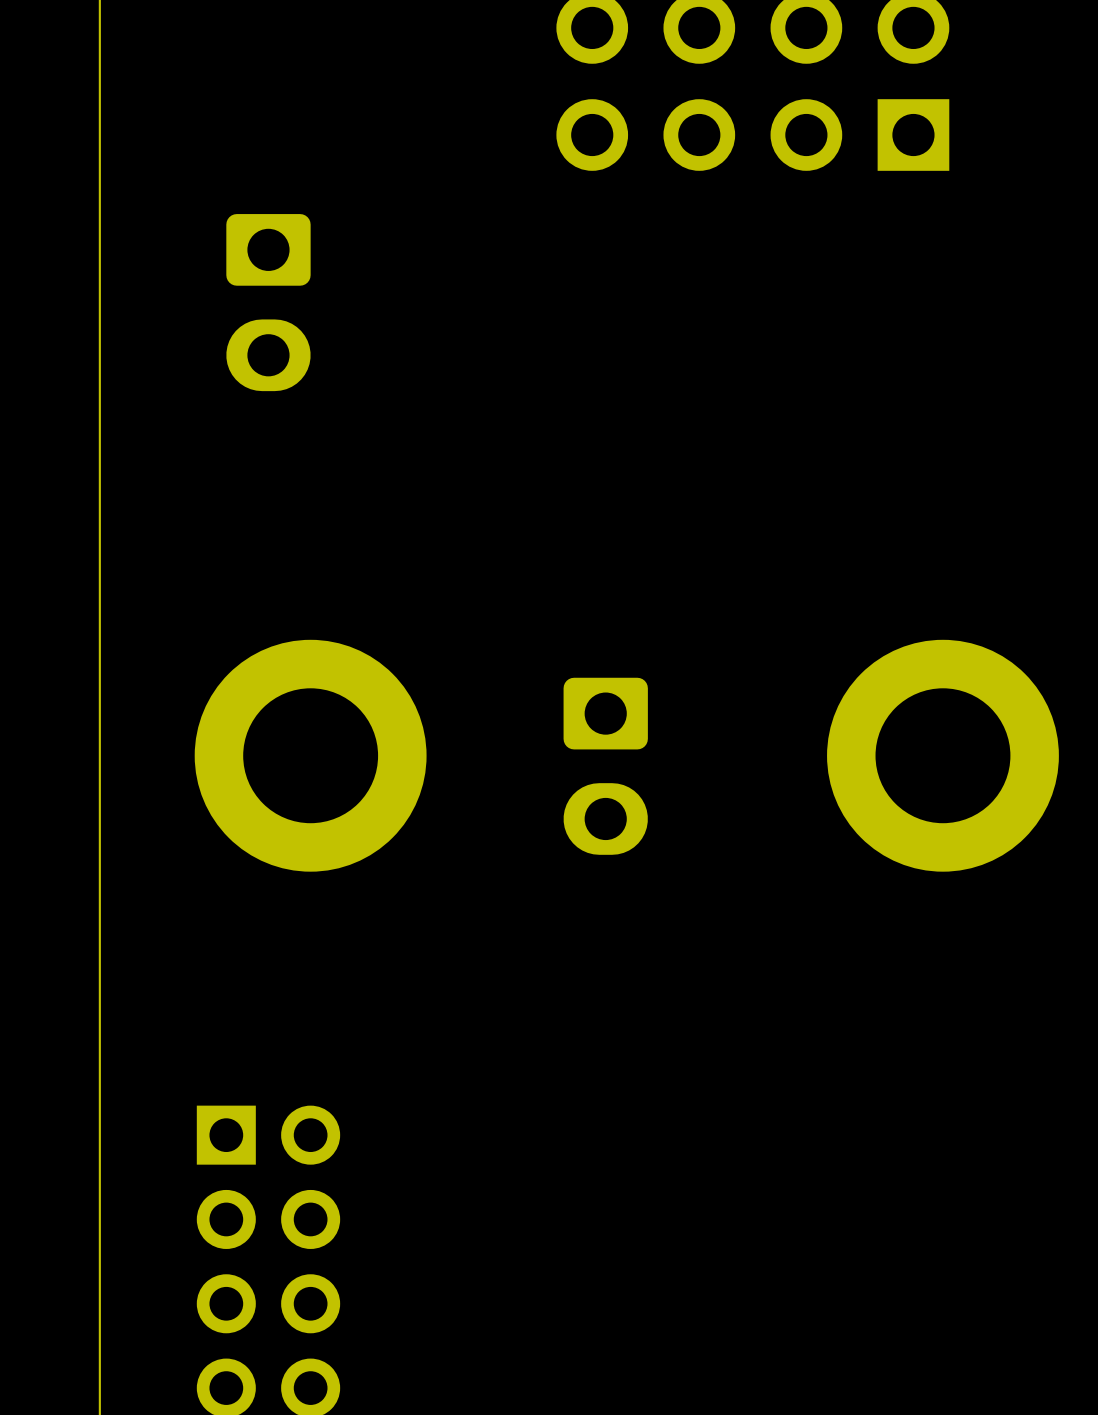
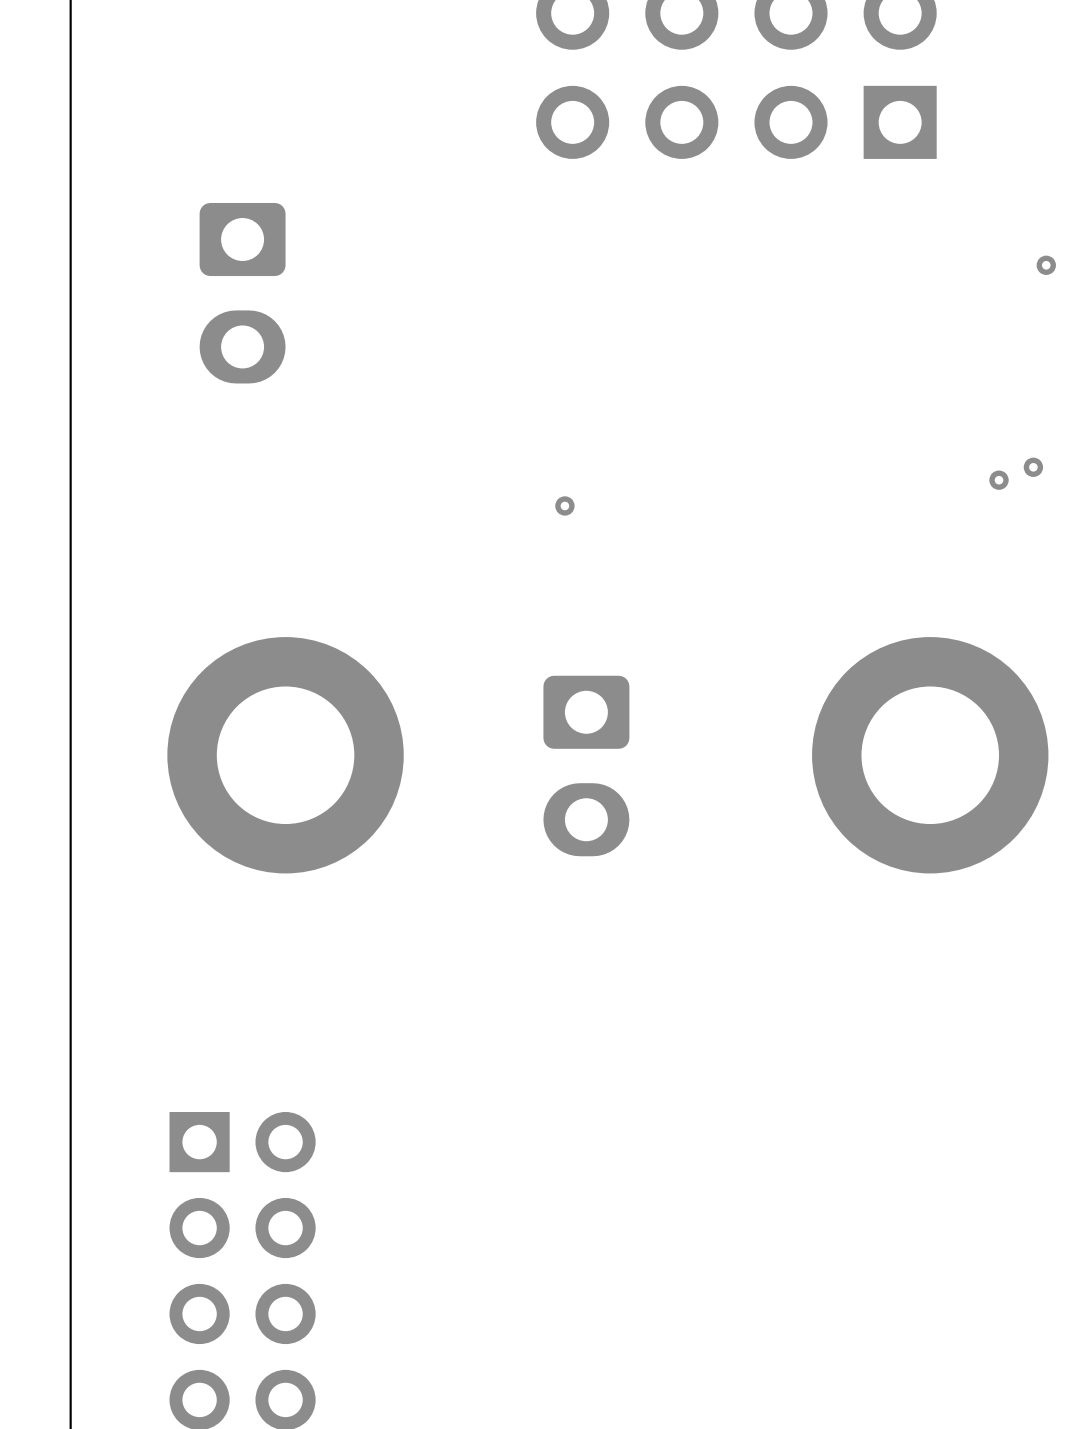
via: none -> (1046, 265)
via: none -> (1033, 467)
via: none -> (999, 480)
via: none -> (564, 505)

